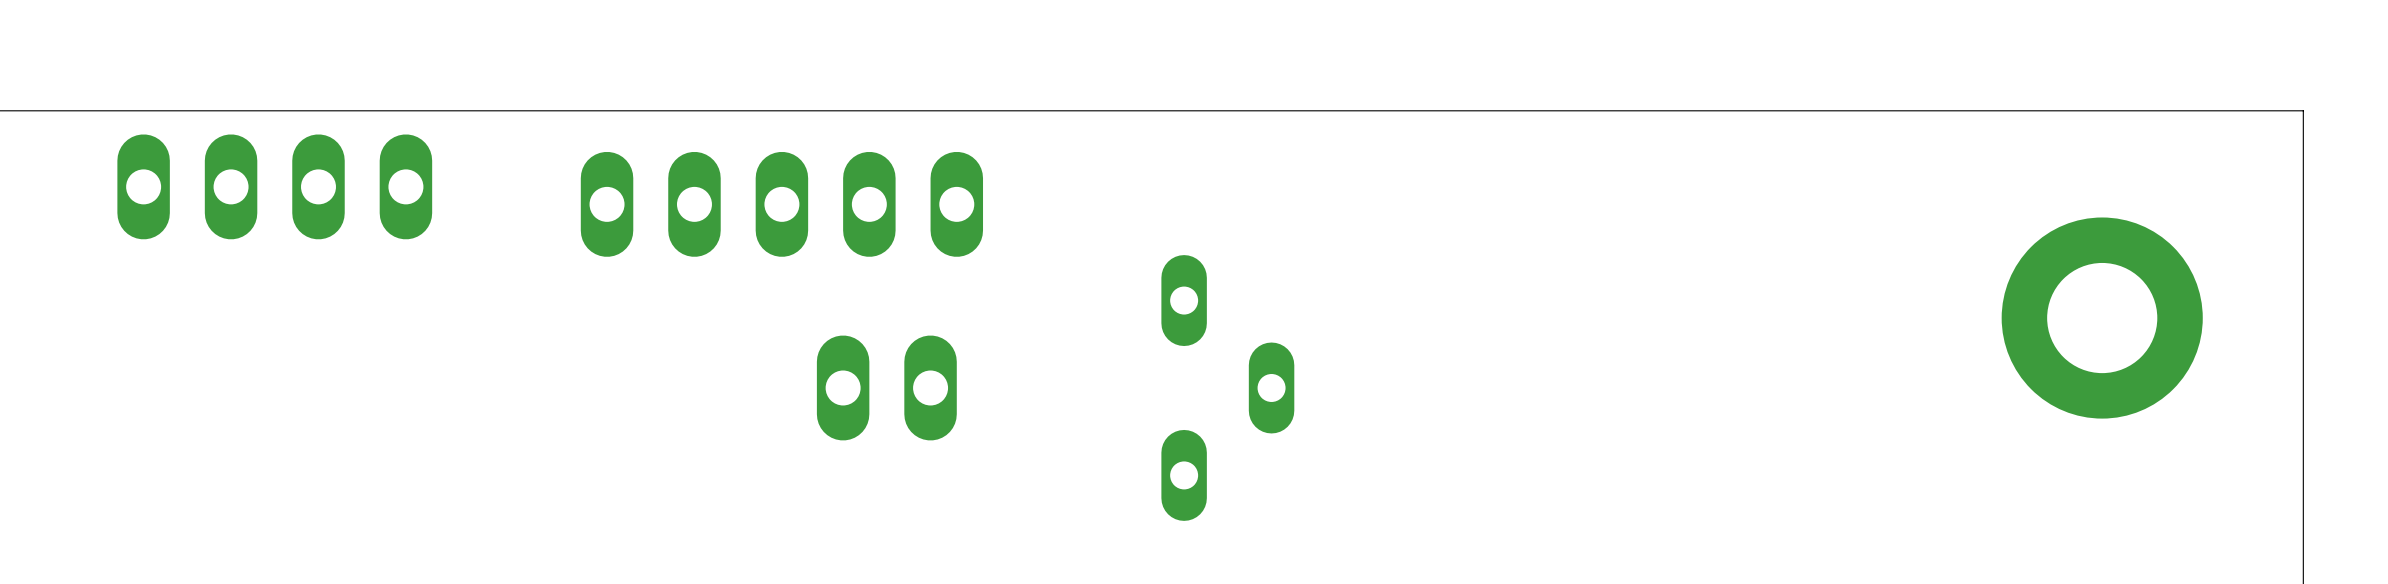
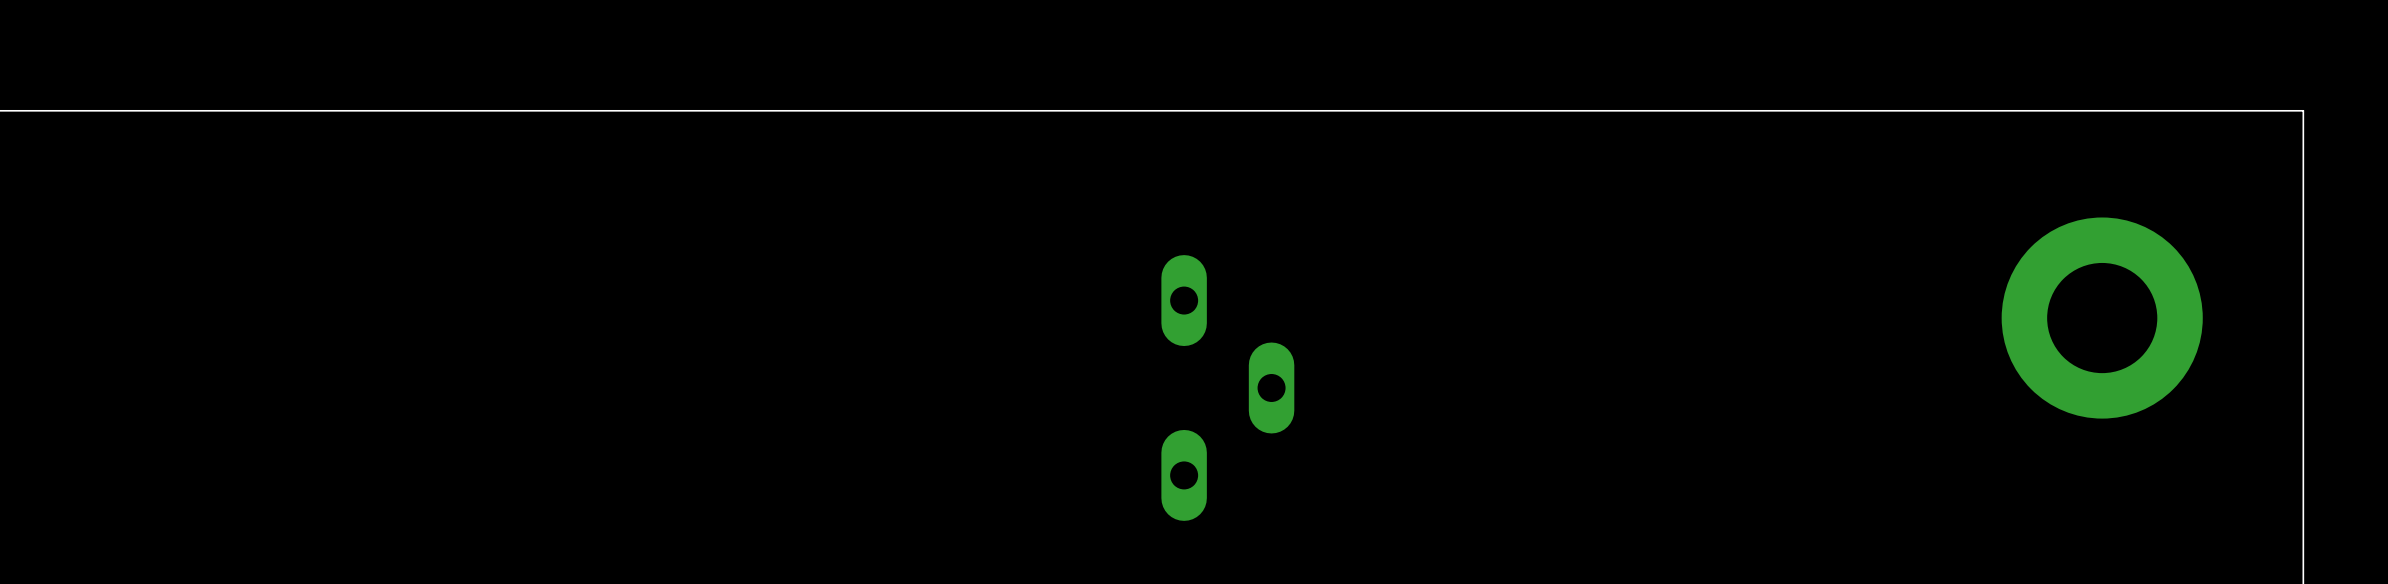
part: (274, 186) -> none
part: (781, 204) -> none
part: (886, 387) -> none

